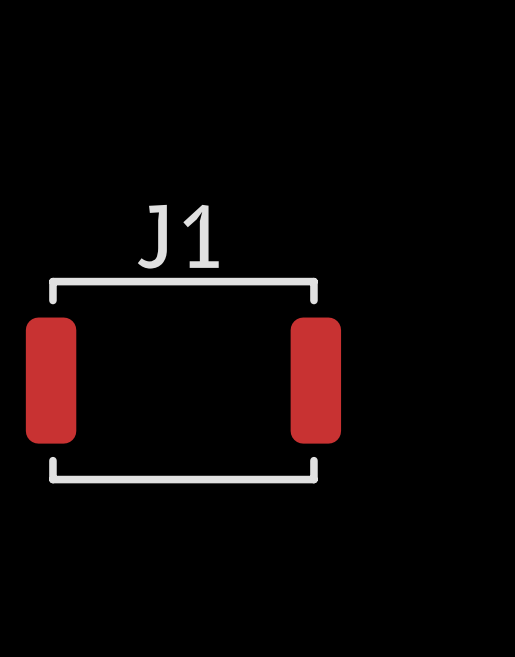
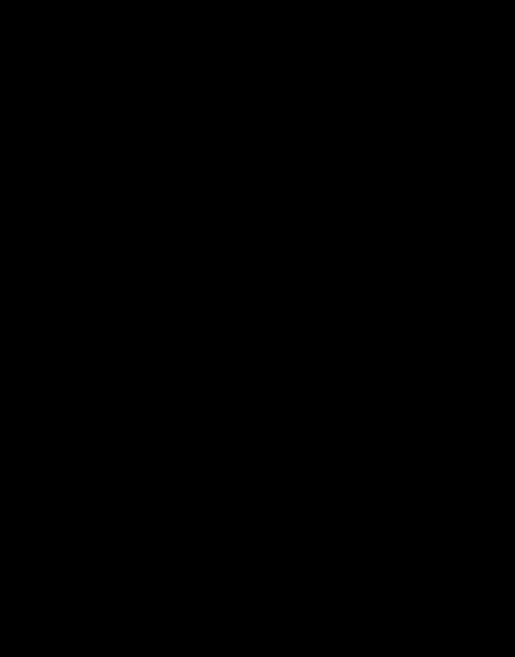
J1: (183, 380) -> none

